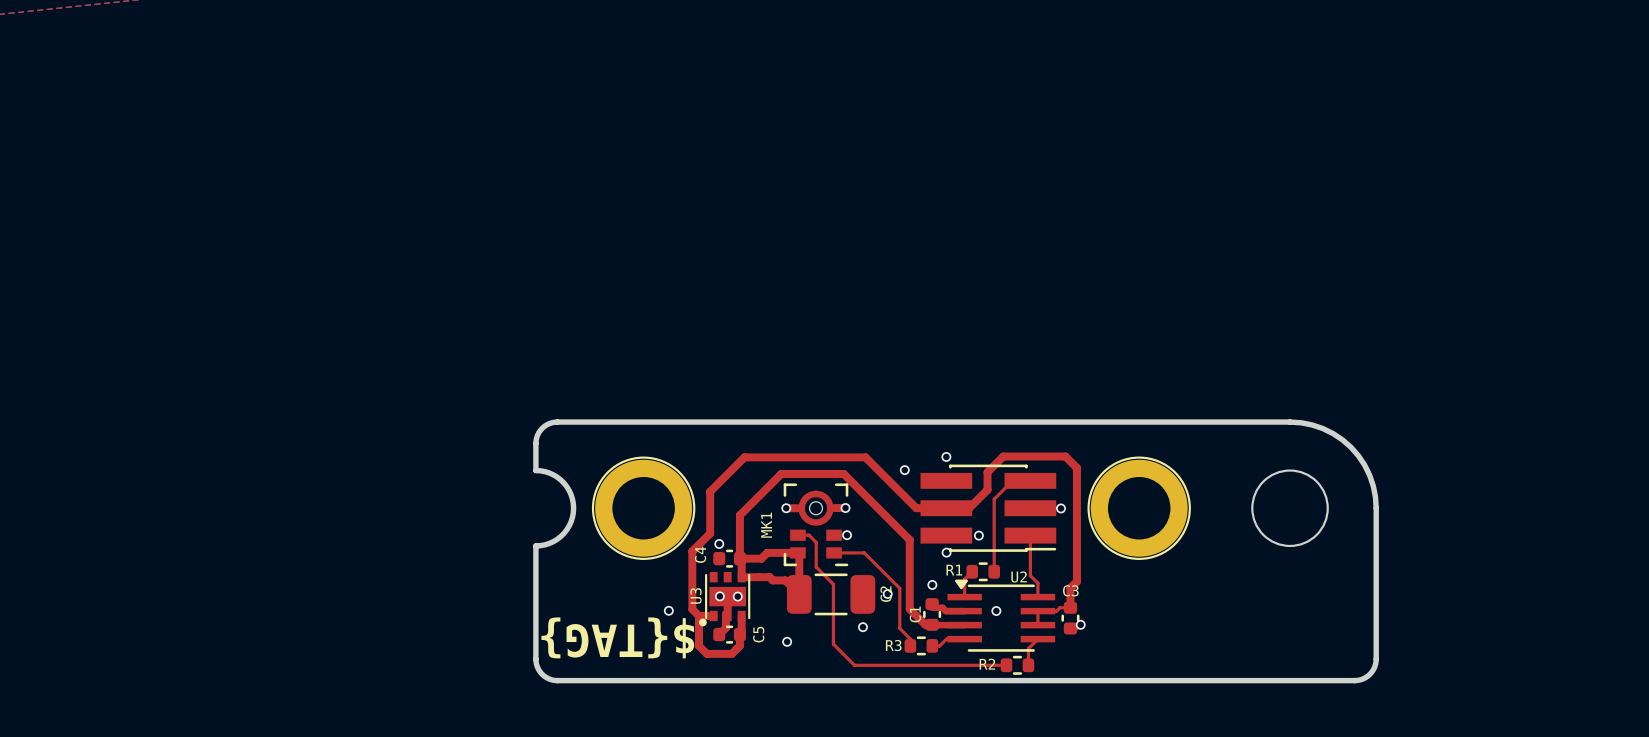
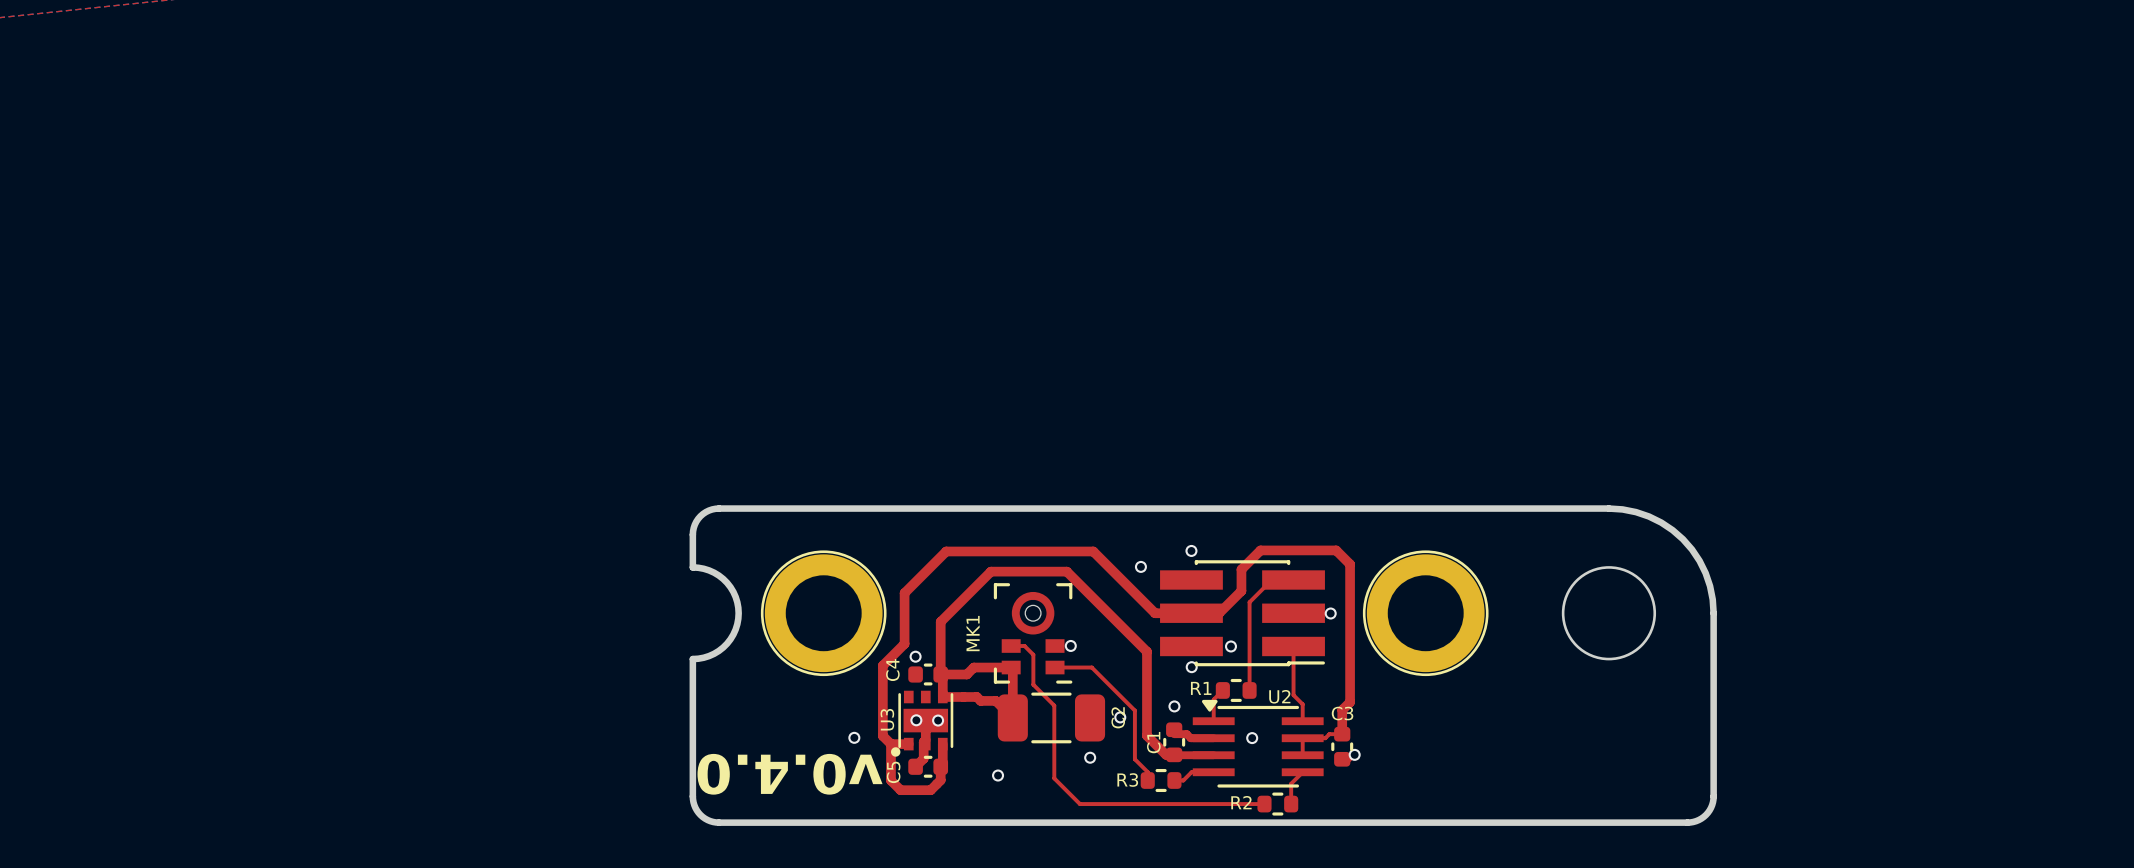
top track: (786, 508) (797, 508) -> none
via: (786, 508) -> none
top track: (834, 508) (845, 508) -> none
via: (845, 508) -> none
C5 name position: C5 (758, 634) -> C5 (893, 772)
text: ${TAG} (617, 637) -> v0.4.0 (790, 774)

